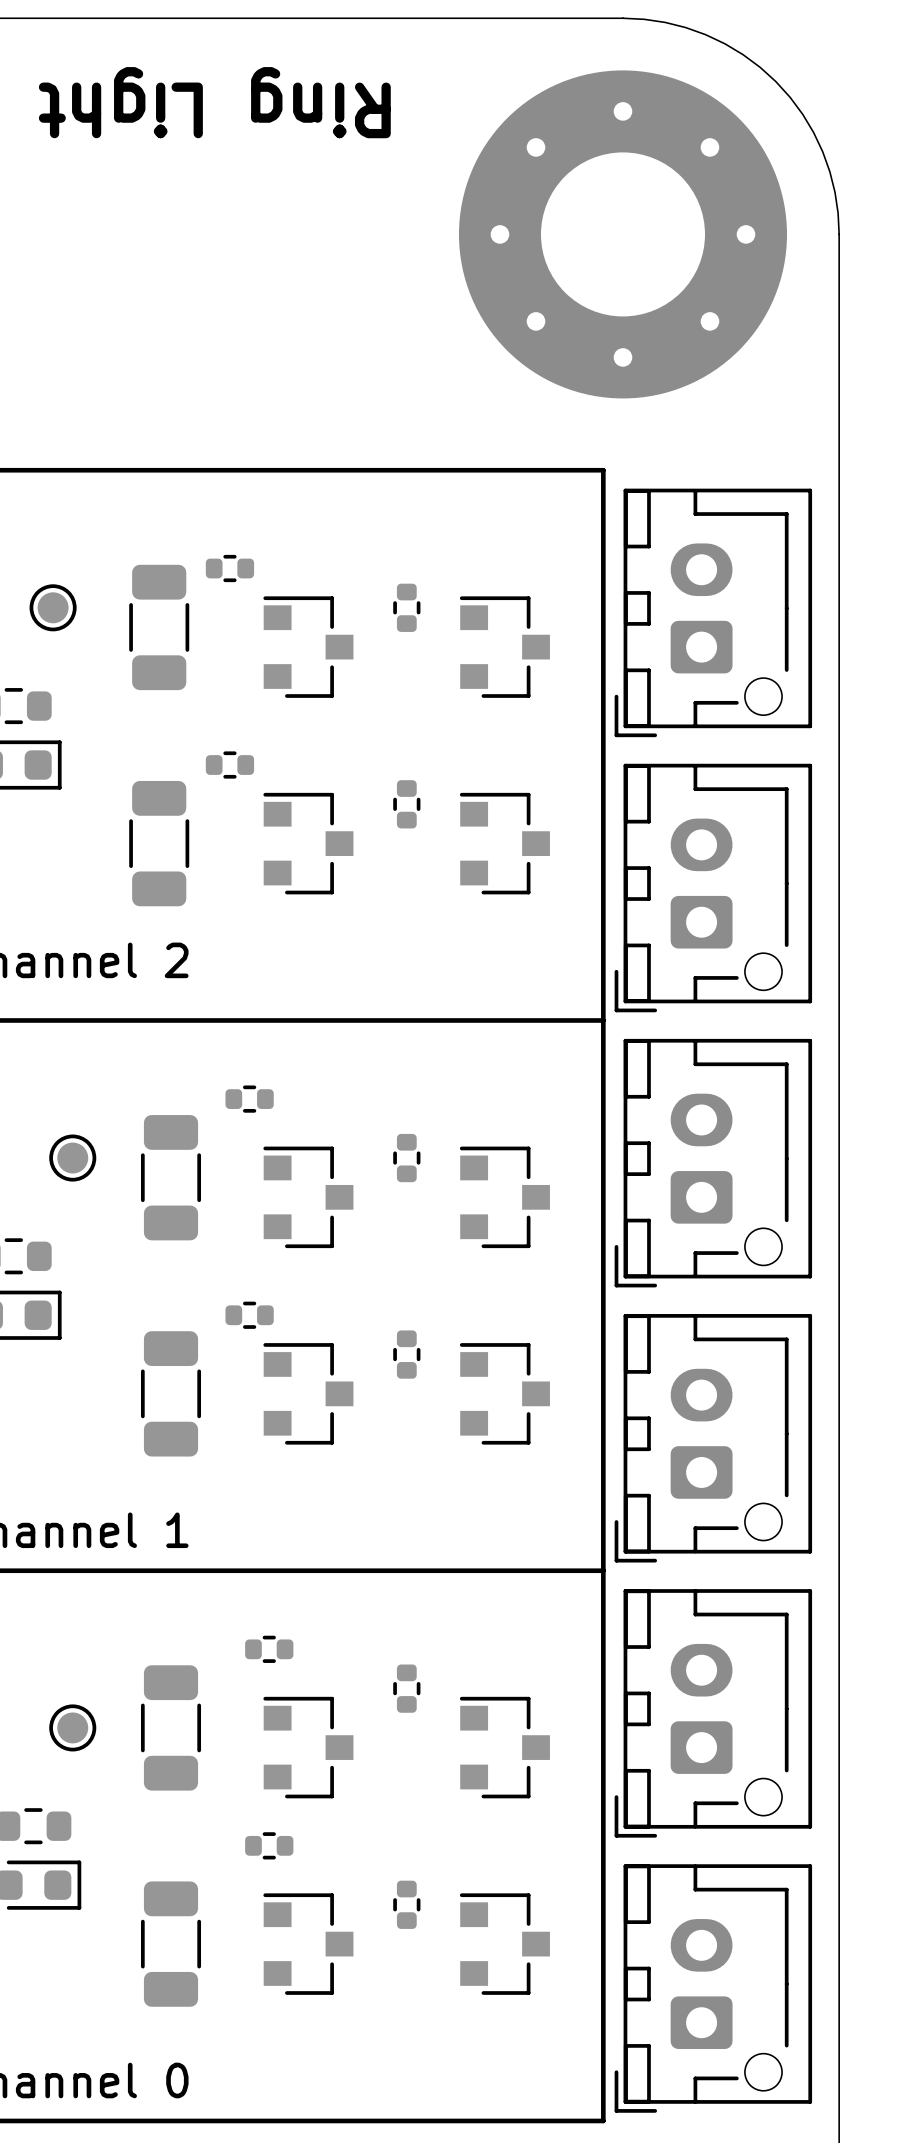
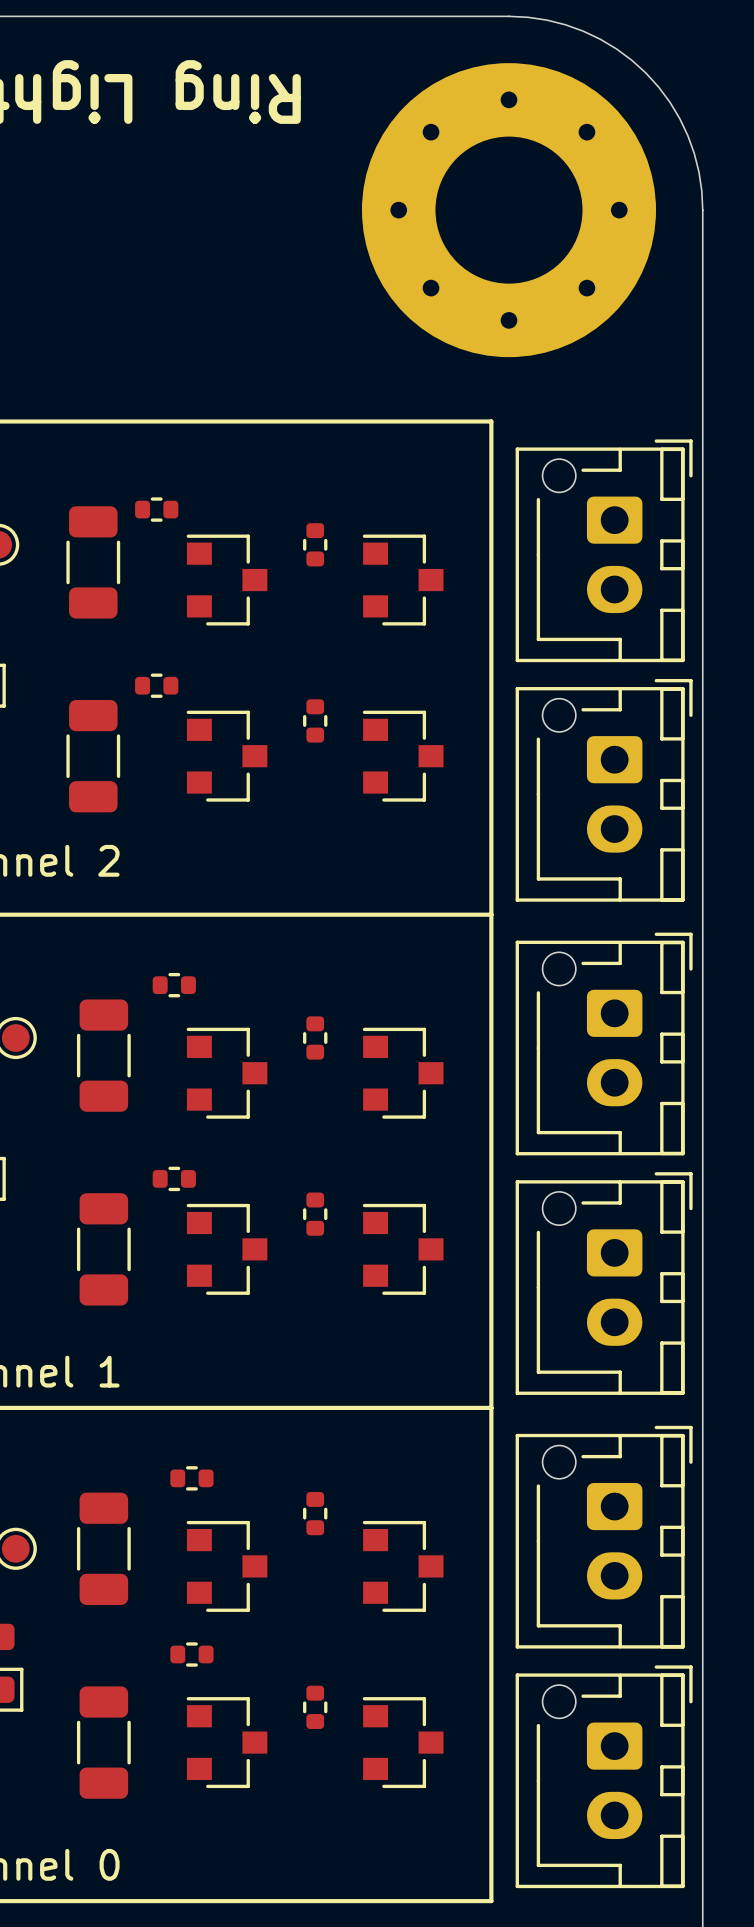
part rotation: 0° (713, 612) -> 180° (604, 550)
part rotation: 0° (713, 888) -> 180° (604, 790)
part rotation: 0° (713, 1163) -> 180° (604, 1043)
part rotation: 0° (713, 1438) -> 180° (604, 1283)
part rotation: 0° (713, 1713) -> 180° (604, 1537)
part rotation: 0° (713, 1988) -> 180° (604, 1776)

